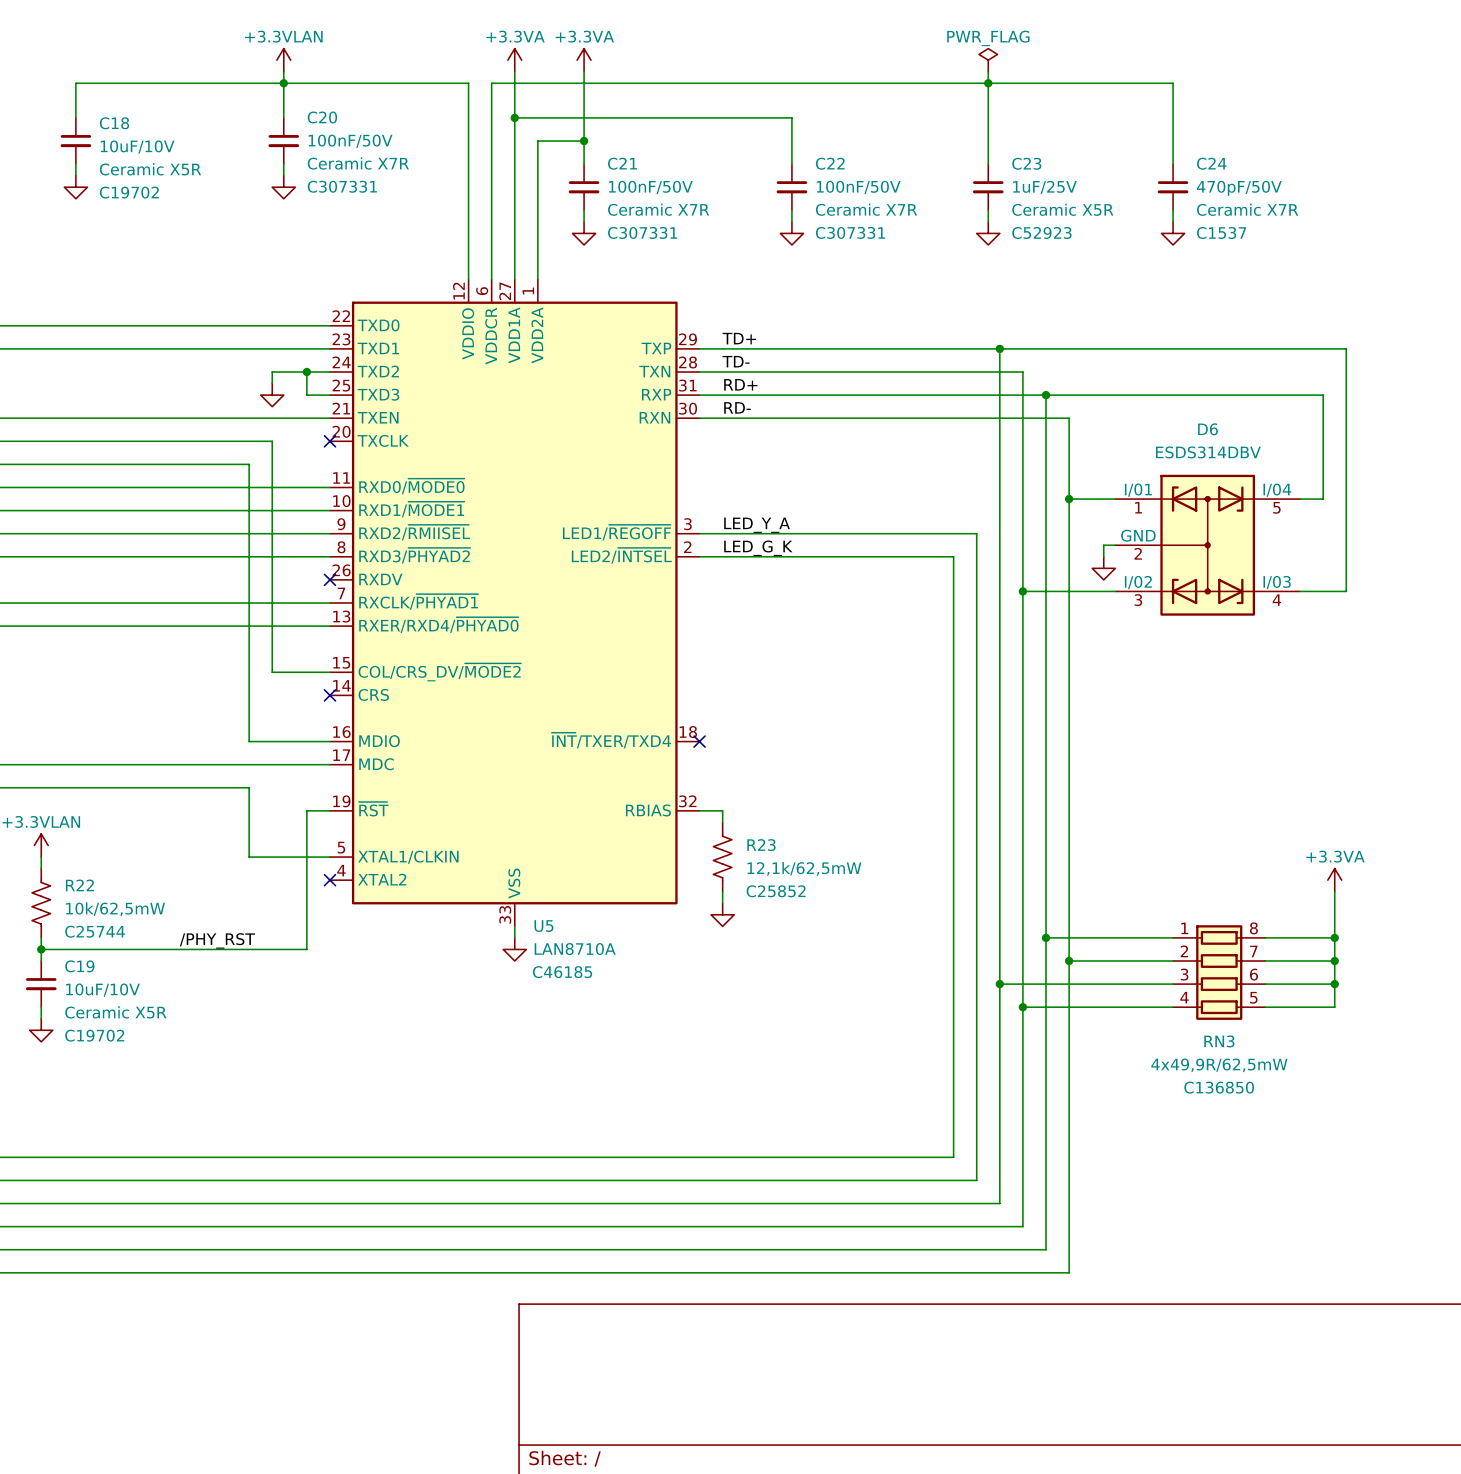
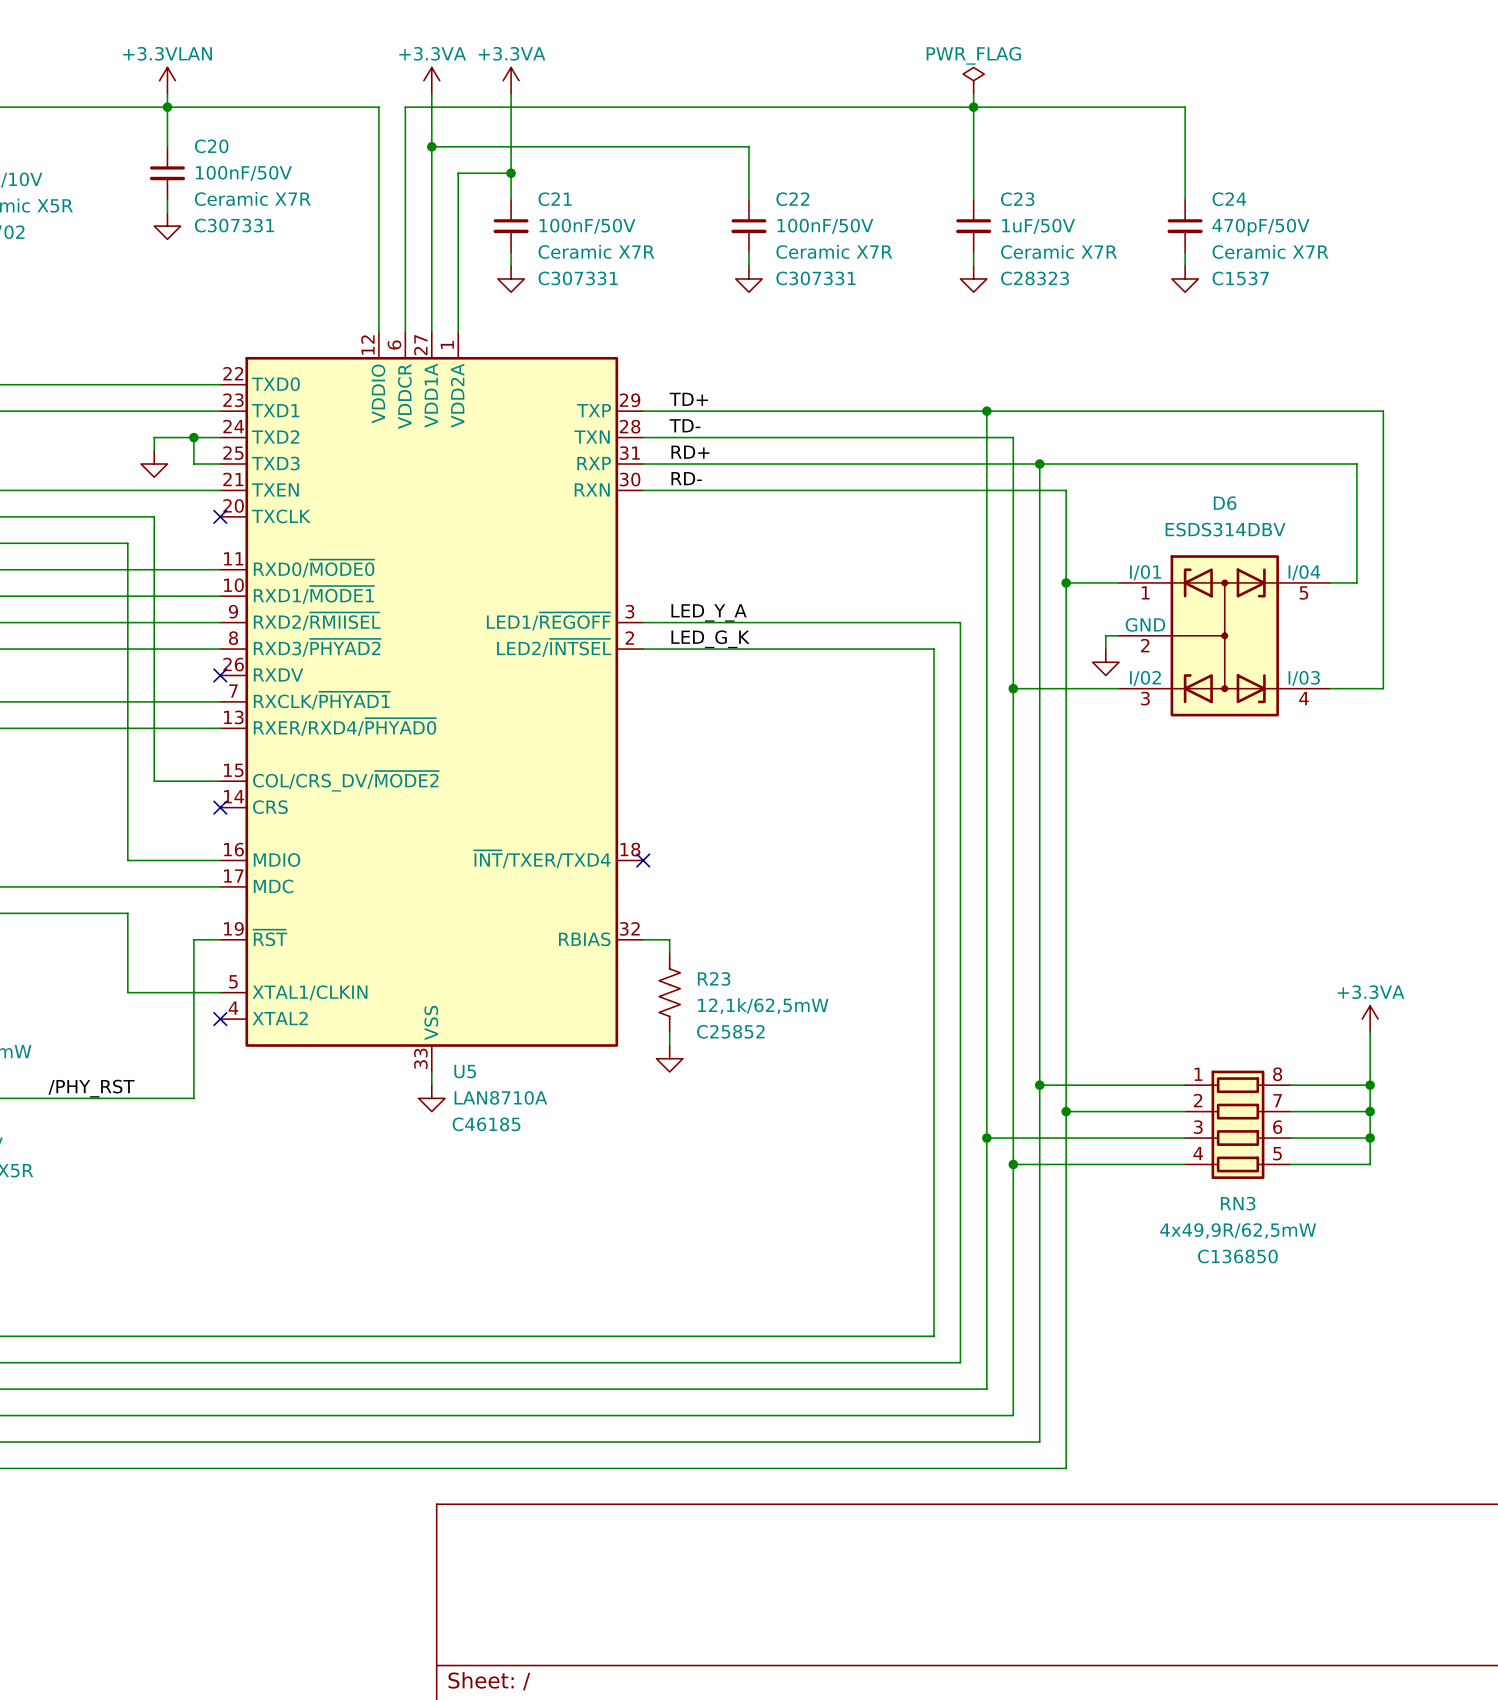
C23 value: 1uF/25V (1044, 187) -> 1uF/50V (1038, 226)
C23 text: Ceramic X5R (1062, 209) -> Ceramic X7R (1059, 251)
C23 text: C52923 (1041, 233) -> C28323 (1035, 278)

